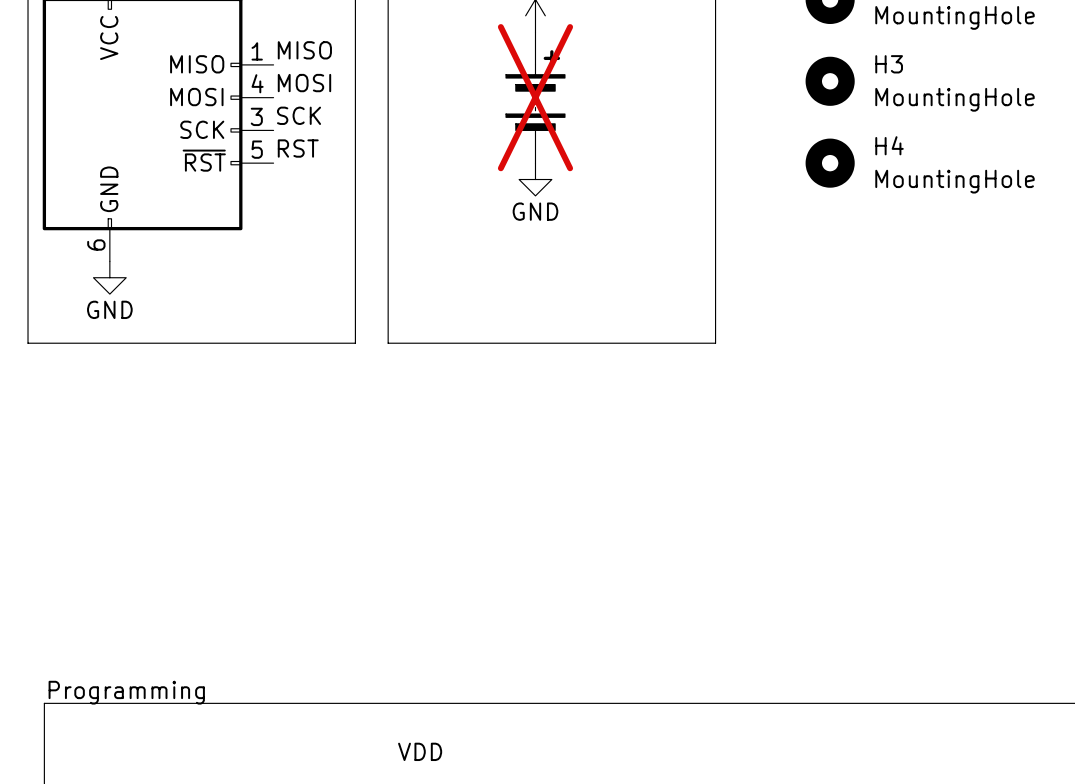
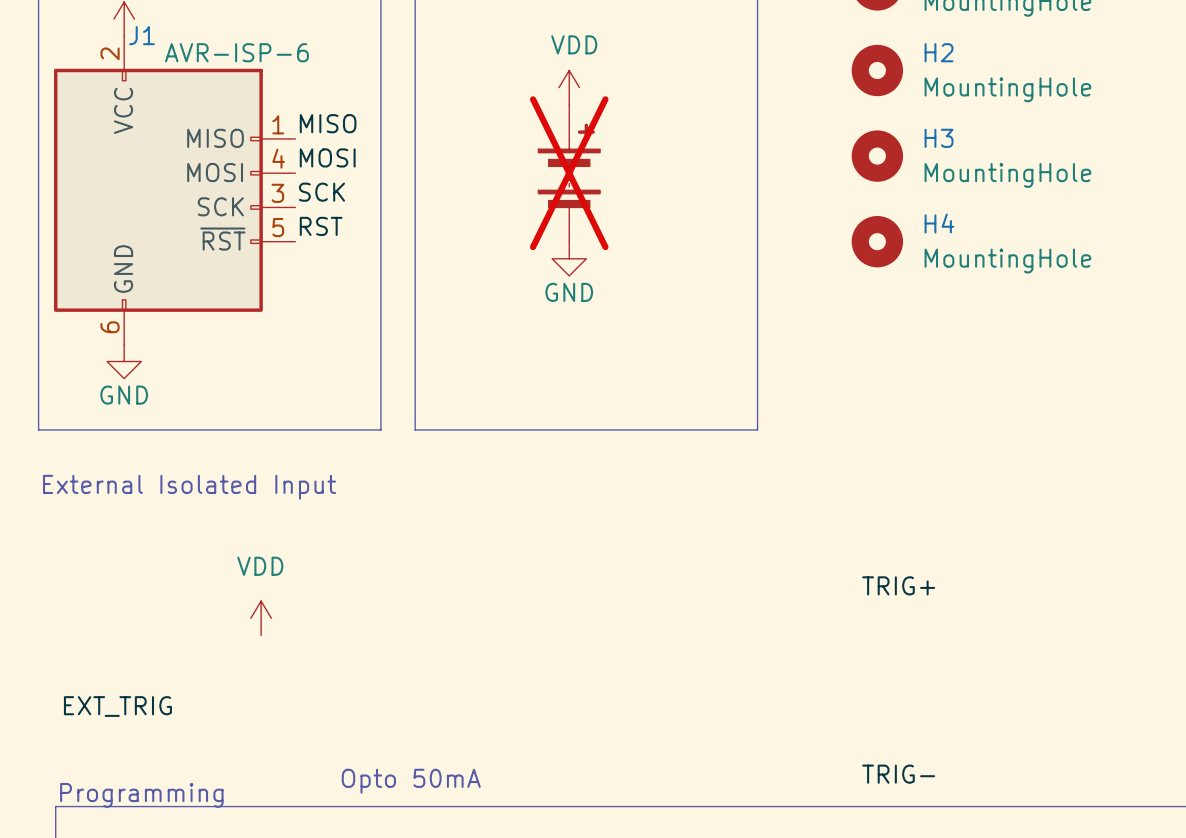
text: none -> External Isolated Input (189, 487)
label: none -> TRIG+ (898, 585)
power symbol: none -> VDD (261, 618)
label: none -> EXT_TRIG (117, 706)
label: none -> TRIG- (898, 774)
text: none -> Opto 50mA (411, 781)

